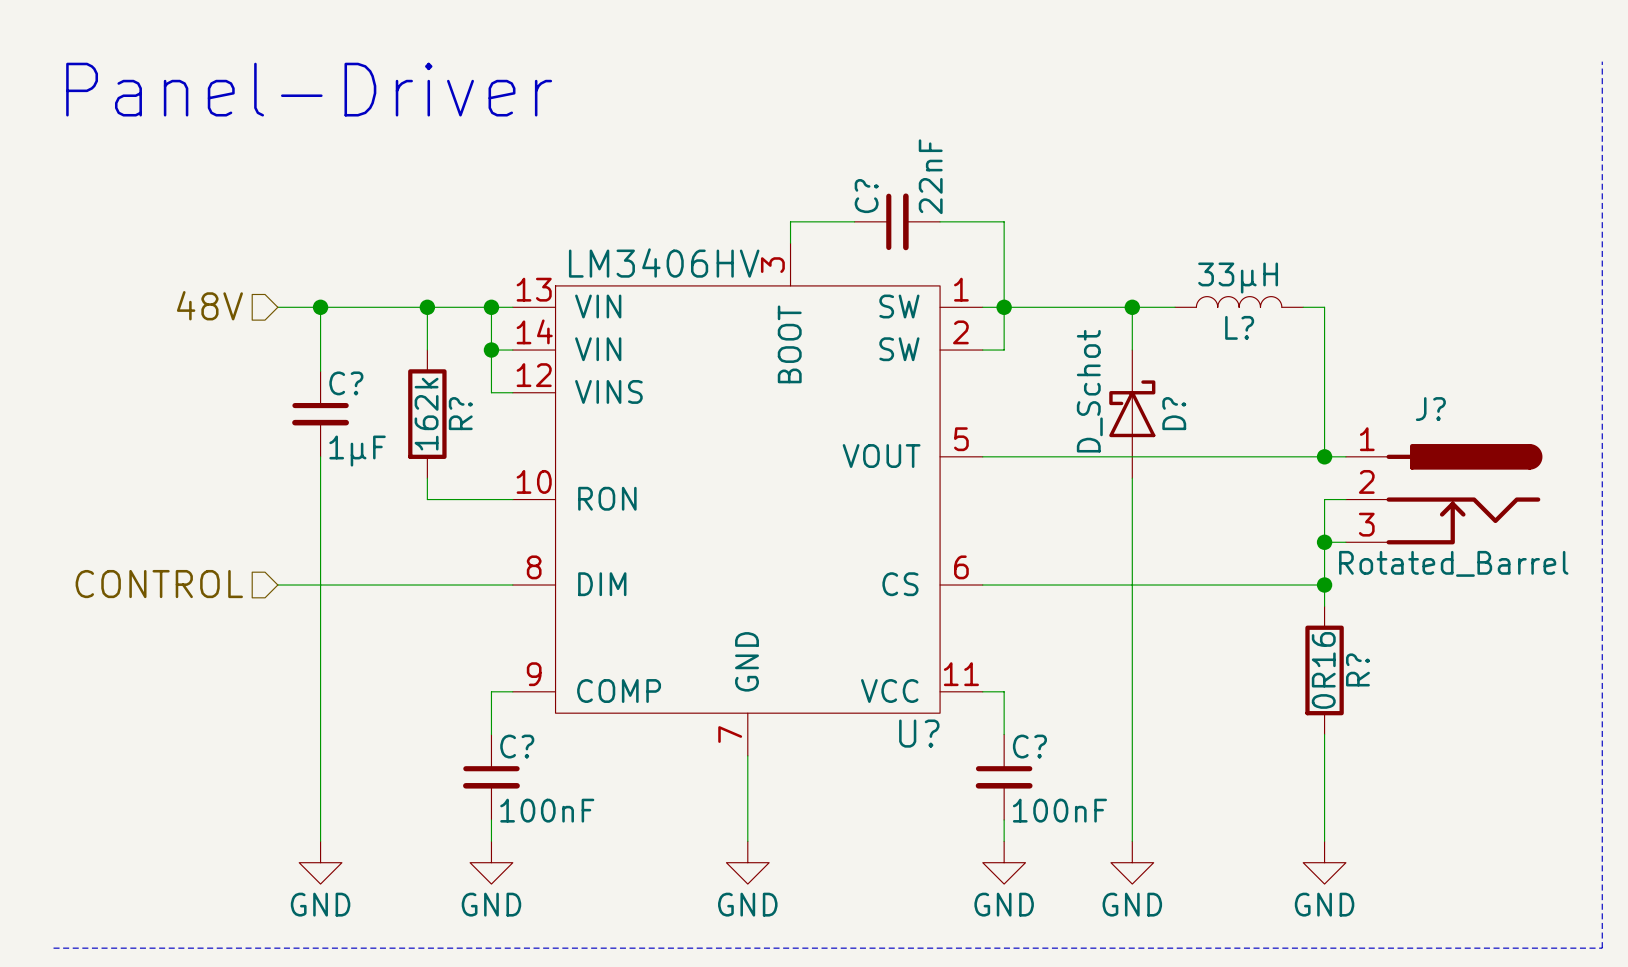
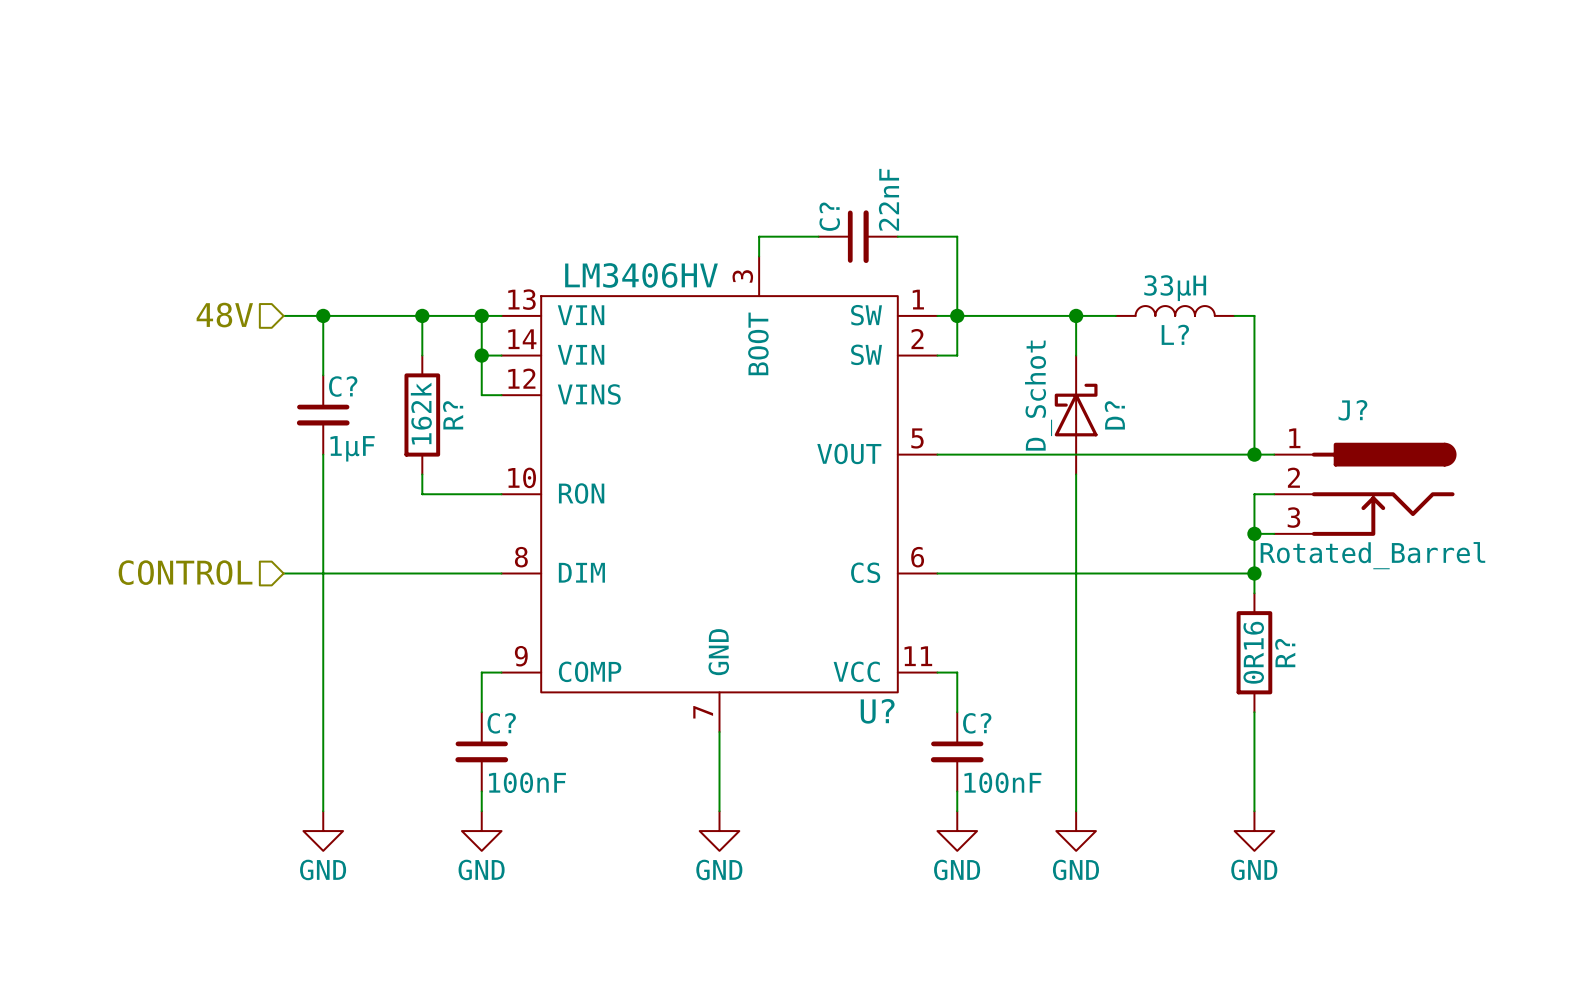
line: (1602, 61) (1602, 948) (53, 948) -> none
text: Panel-Driver (309, 89) -> none

